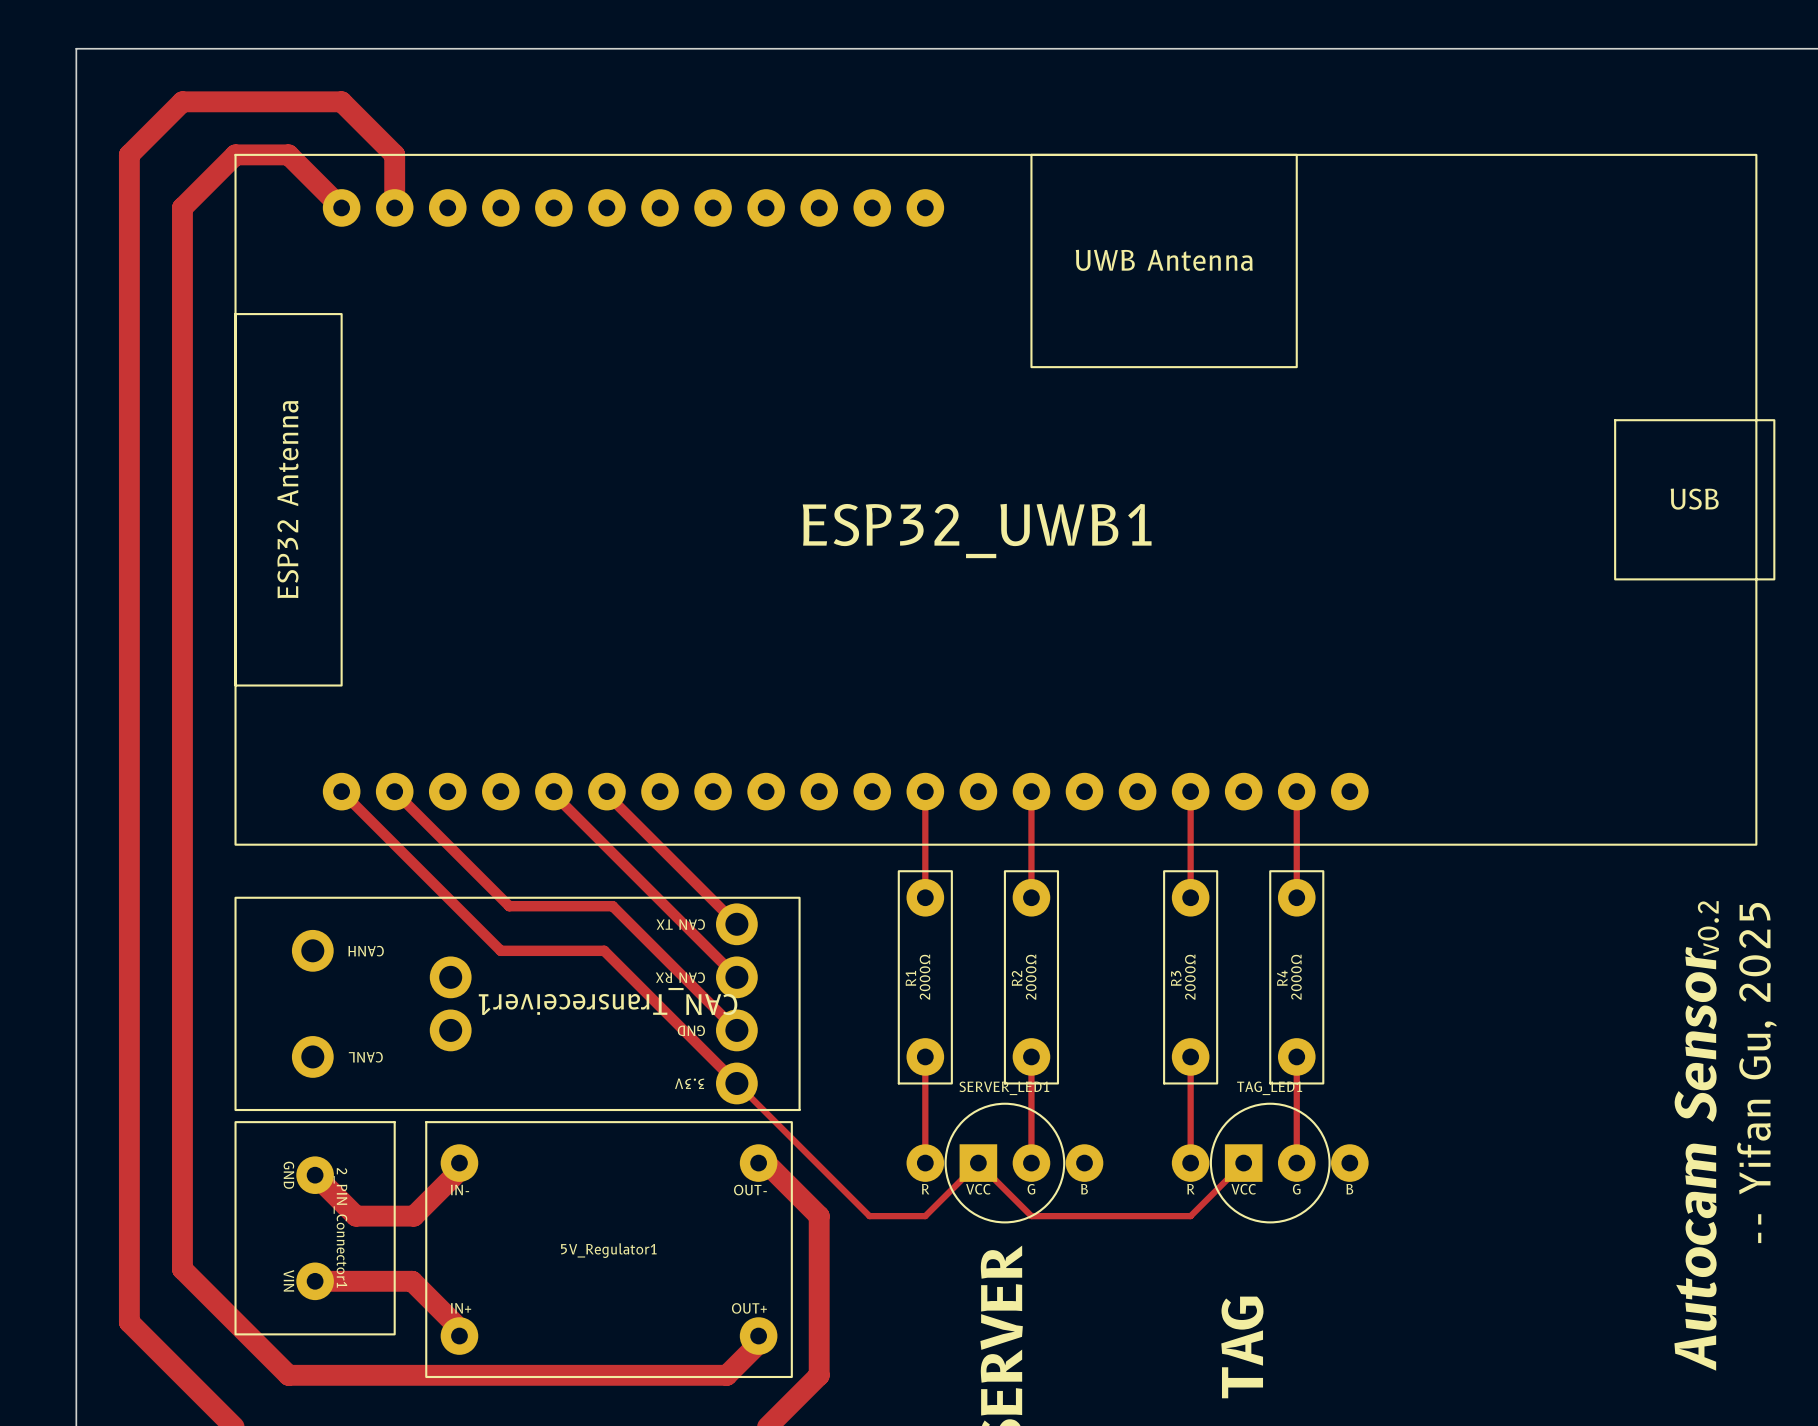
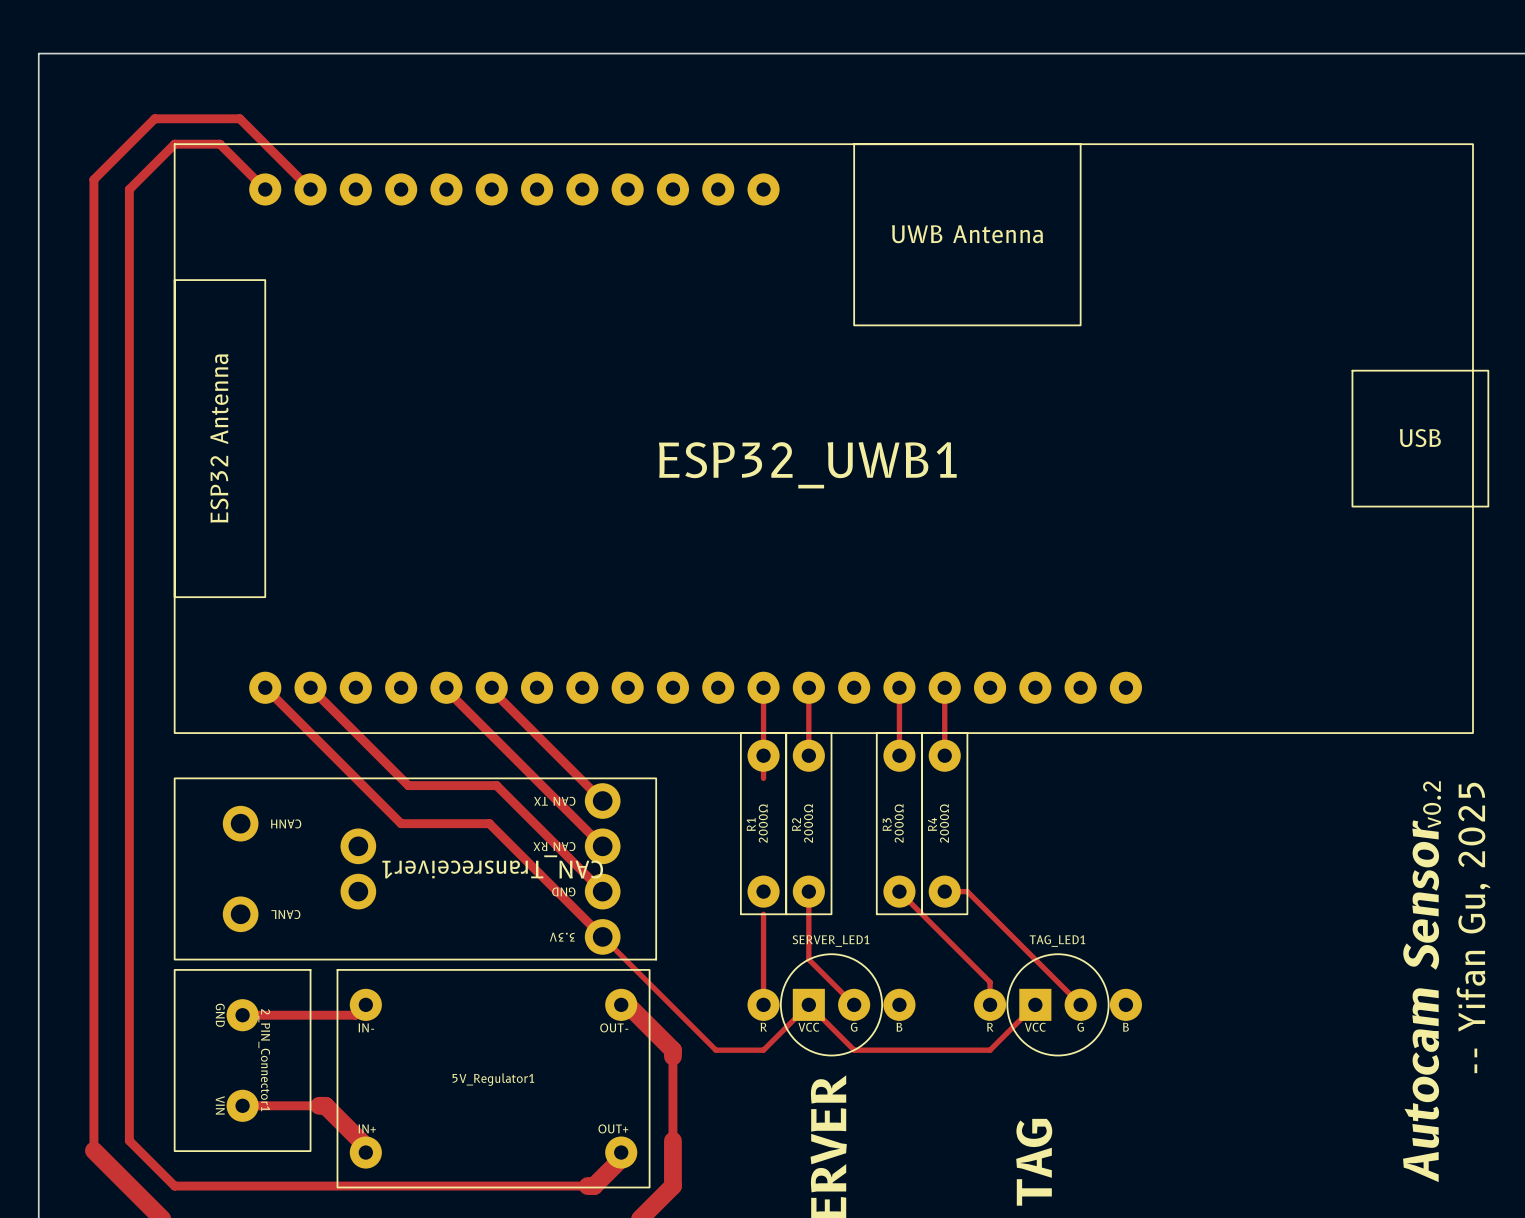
top track width: thick (341, 207) (288, 154) (235, 154) (182, 207) (182, 1269) -> thin (265, 189) (219, 144) (174, 144) (129, 189) (129, 1095)
top track: (394, 207) (394, 154) (341, 101) (182, 101) (129, 154) (129, 1322) (140, 1333) -> (310, 189) (239, 118) (154, 118) (93, 179) (93, 1150)
top track: none -> (808, 687) (808, 755)
top track: (1031, 791) (1031, 897) -> none
top track: none -> (899, 687) (899, 755)
top track: none -> (944, 687) (944, 755)
top track: (1190, 791) (1190, 897) -> none
top track: (1296, 791) (1296, 897) -> none
R1 position: (925, 977) -> (763, 823)
R2 position: (1031, 977) -> (808, 823)
R3 position: (1190, 977) -> (899, 823)
R4 position: (1296, 977) -> (944, 823)
top track: (1031, 1056) (1031, 1163) -> (808, 891) (808, 959) (854, 1004)
top track: (1190, 1056) (1190, 1136) -> (899, 891) (990, 982)
top track: (1296, 1056) (1296, 1163) -> (944, 891) (967, 891) (1080, 1004)
top track: (466, 1163) (413, 1216) (356, 1216) (315, 1175) -> (365, 1004) (355, 1015) (242, 1015)
top track width: thick (819, 1223) (819, 1322) -> thin (672, 1056) (672, 1140)
top track: (182, 1269) (288, 1375) -> (129, 1095) (129, 1140) (174, 1186) (219, 1186)
top track width: thick (315, 1281) (404, 1281) -> thin (242, 1105) (319, 1105)
top track width: thick (288, 1375) (719, 1375) -> thin (219, 1186) (587, 1186)

